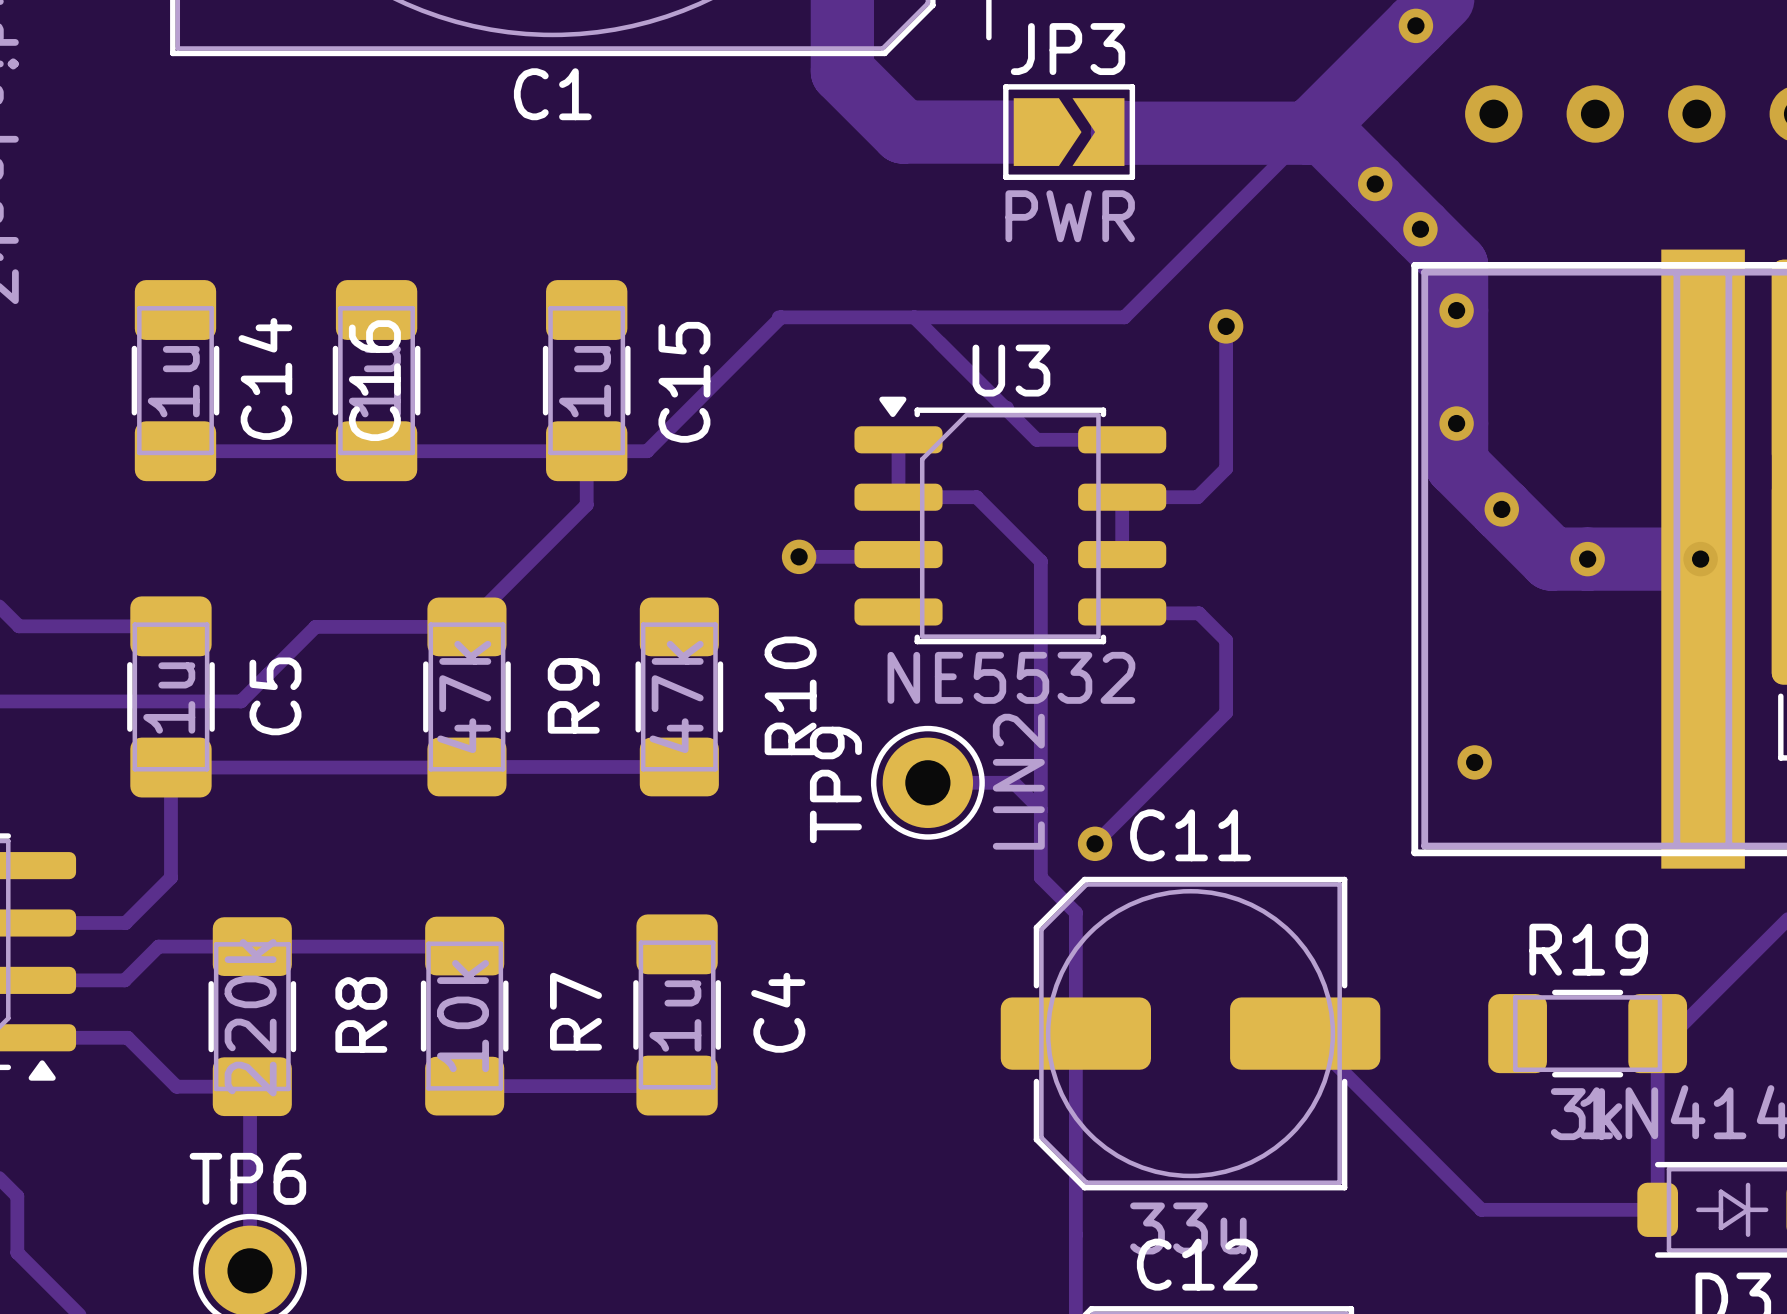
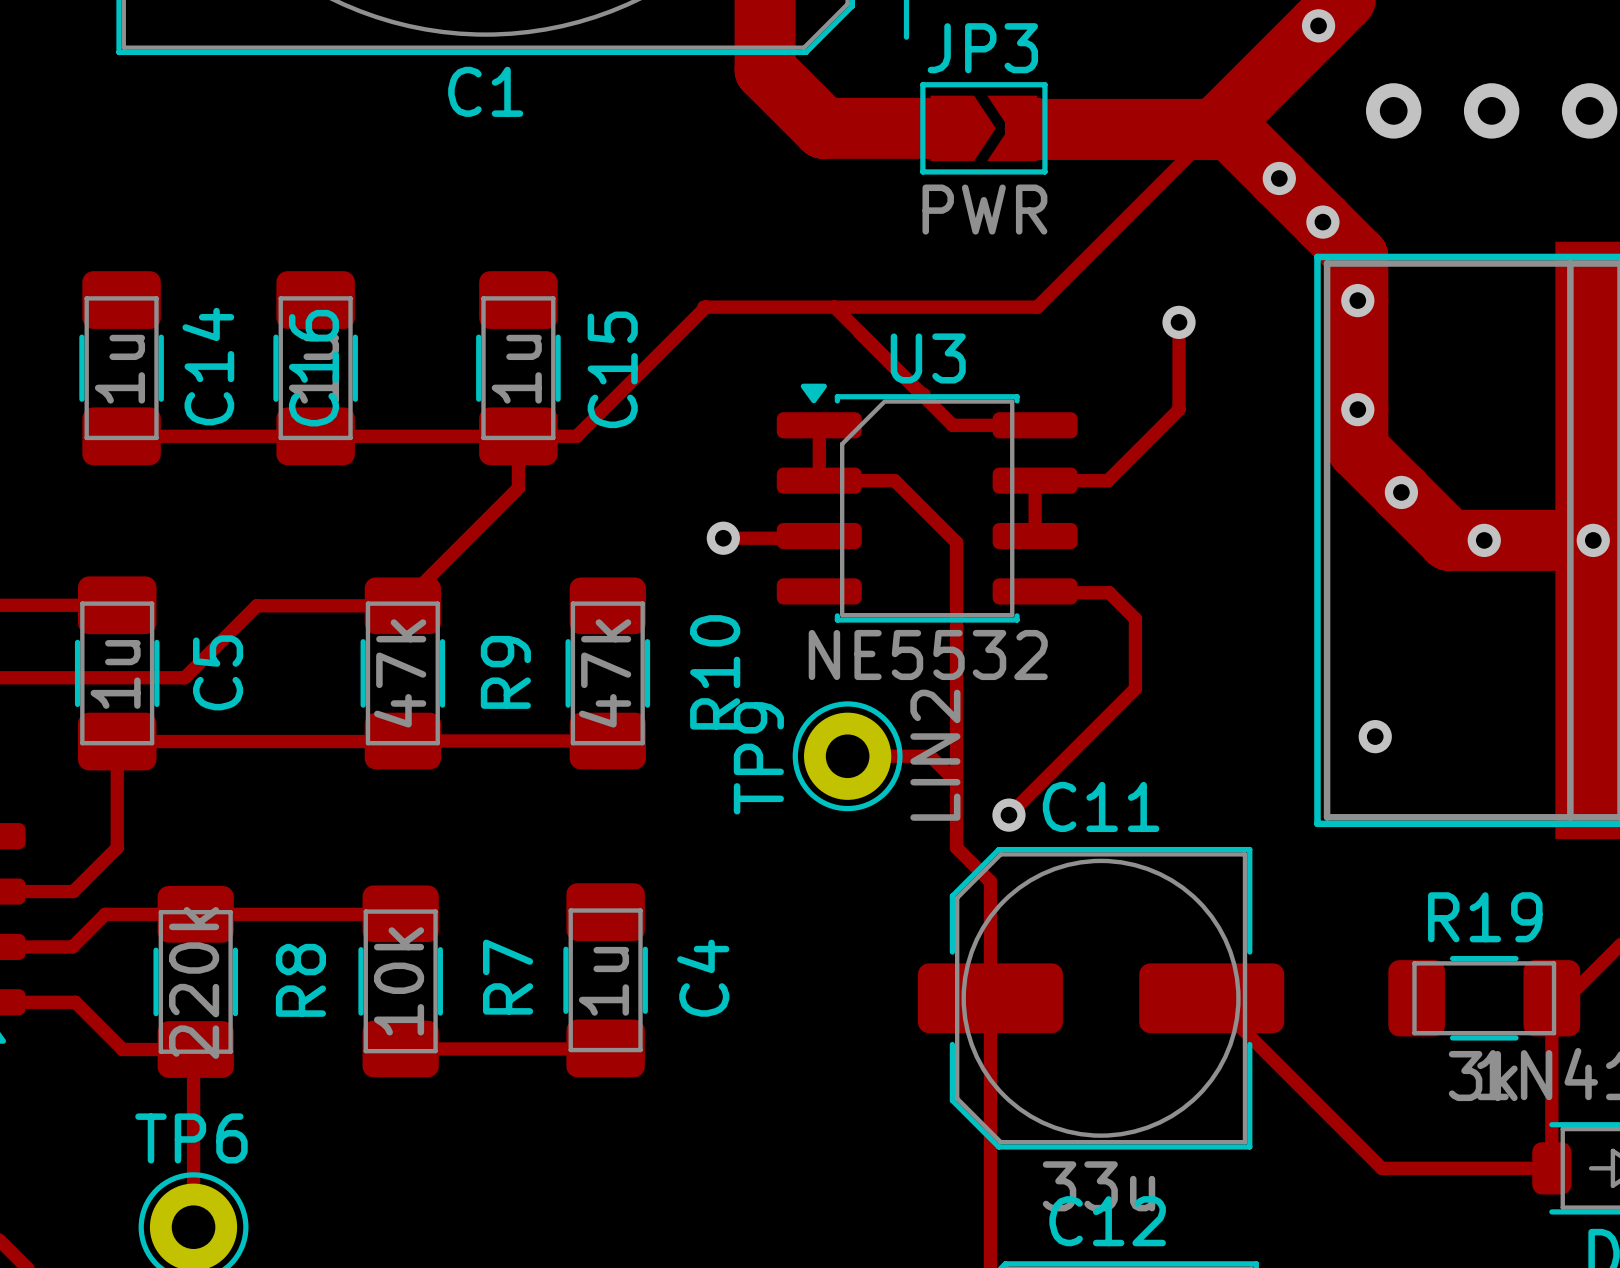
track: (1226, 326) (1226, 468) -> (1179, 322) (1179, 409) (1135, 453)
via position: (1226, 326) -> (1179, 322)

